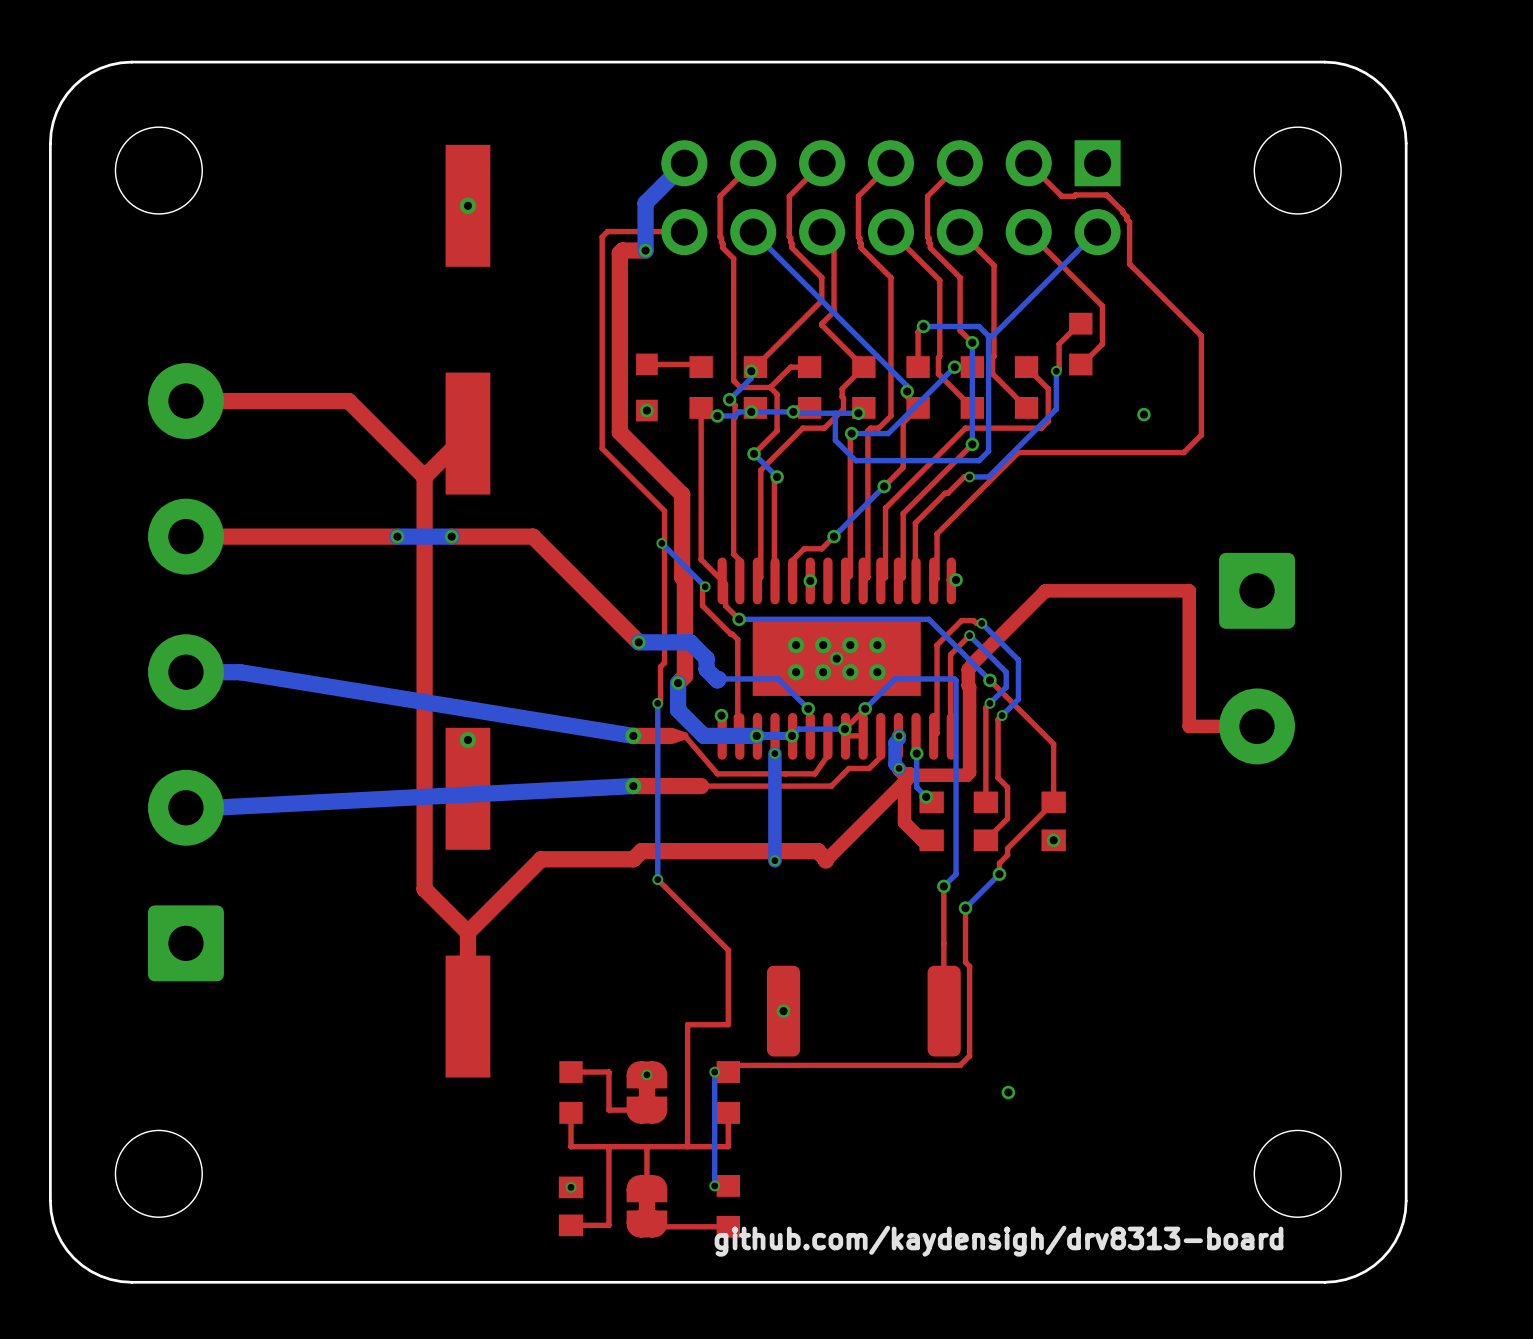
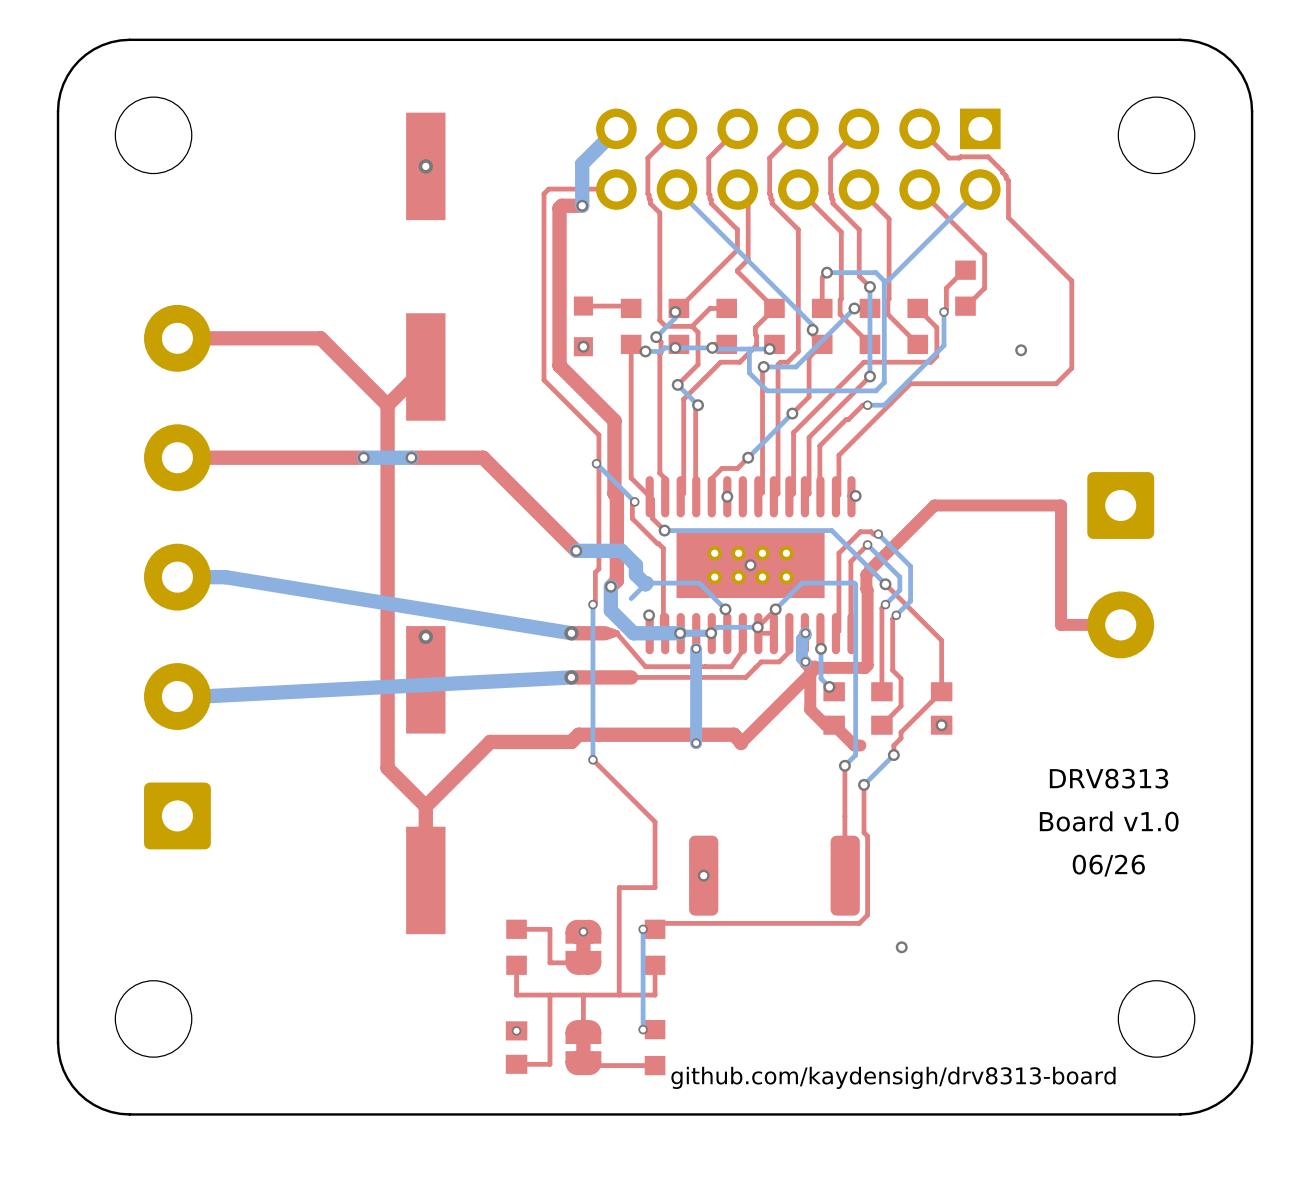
bottom track: none -> (646, 583) (631, 598)
top track: none -> (834, 725) (854, 745) (860, 745)
text: none -> DRV8313 (1109, 778)
text: none -> Board v1.0 (1109, 821)
text: none -> 06/26 (1108, 865)

